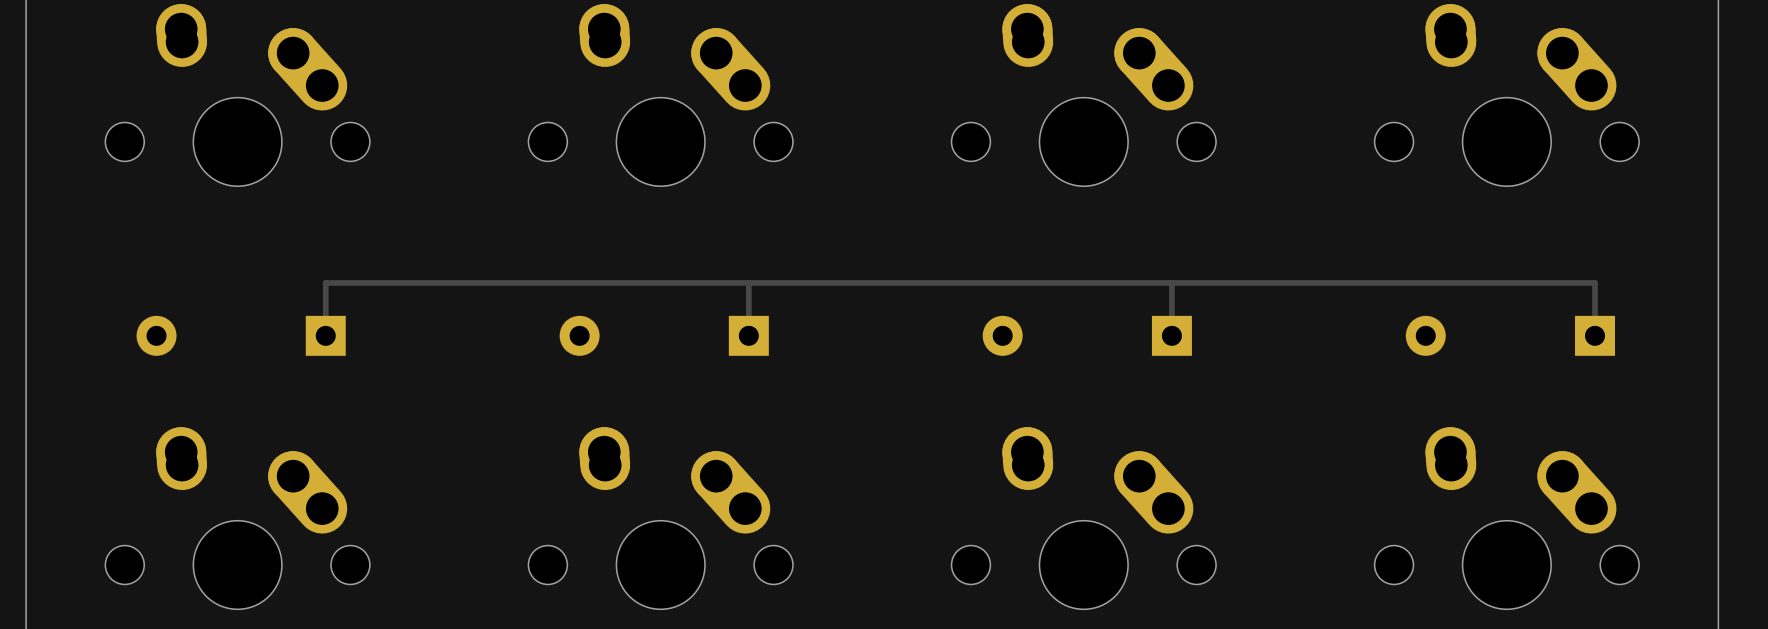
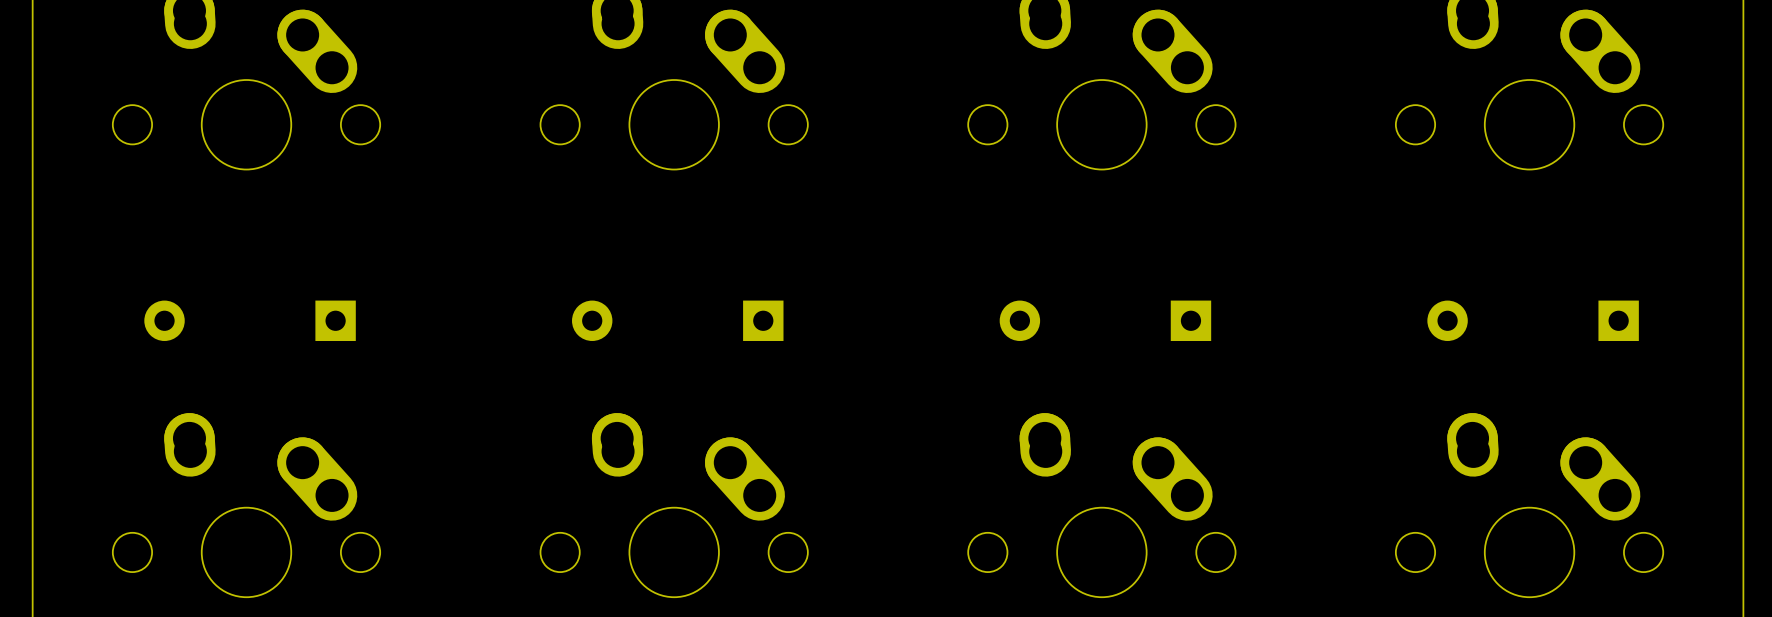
track: (748, 282) (748, 335) -> none
track: (1171, 282) (1171, 335) -> none
track: (1595, 335) (1595, 282) (325, 282) (325, 335) -> none

